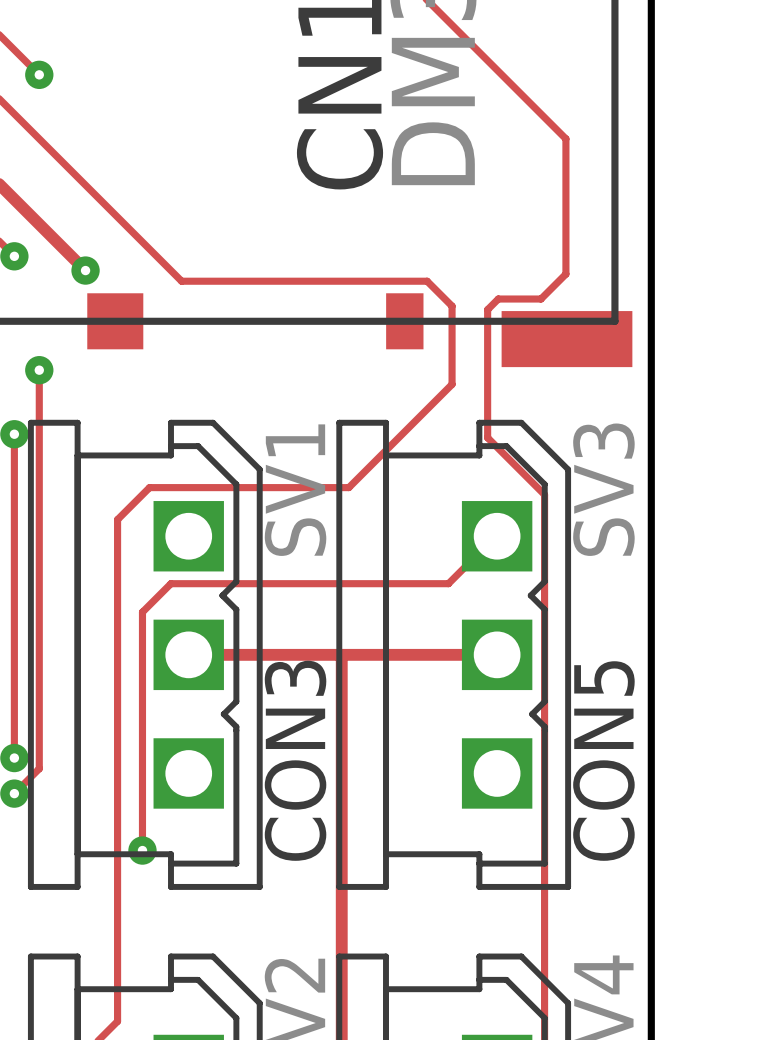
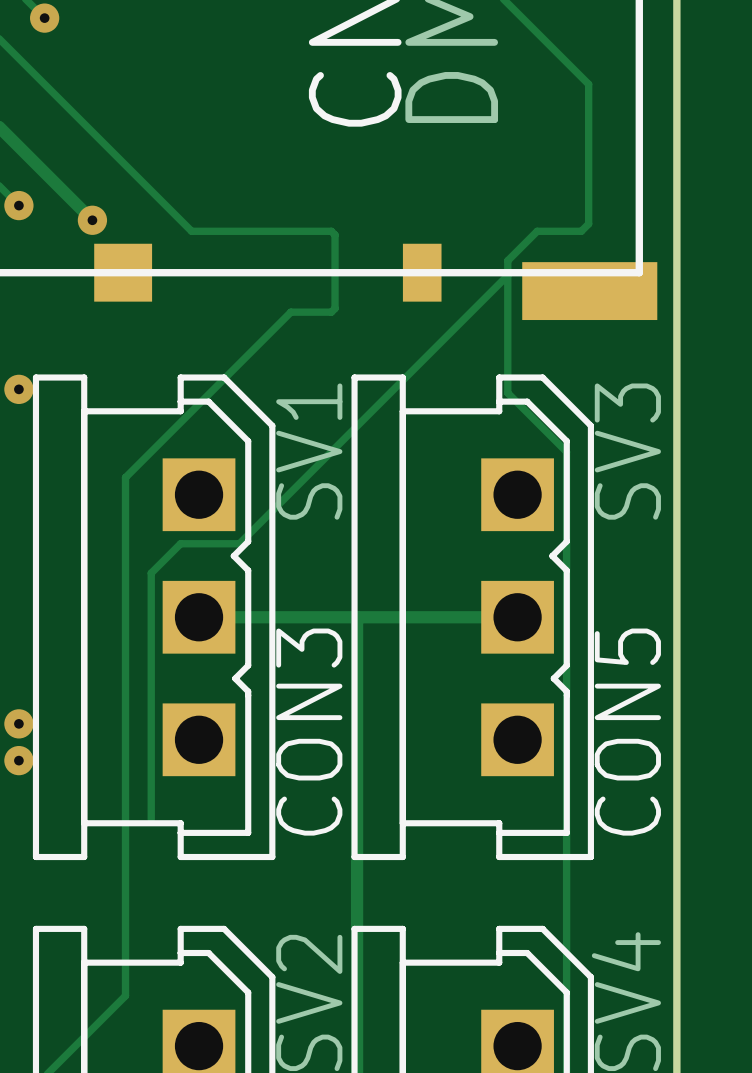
track: (316, 281) (427, 281) (452, 306) (452, 384) (348, 487) (149, 487) -> (331, 231) (335, 234) (335, 308) (331, 312) (290, 312) (158, 444)
track: (558, 281) (541, 299) (498, 299) -> (581, 231) (537, 231) (518, 249)
track: (39, 370) (39, 768) (14, 793) -> none
via: (39, 370) -> none
track: (14, 434) (14, 758) -> none
track: (497, 536) (448, 583) (227, 583) -> (507, 275) (239, 543)
via: (142, 850) -> none

